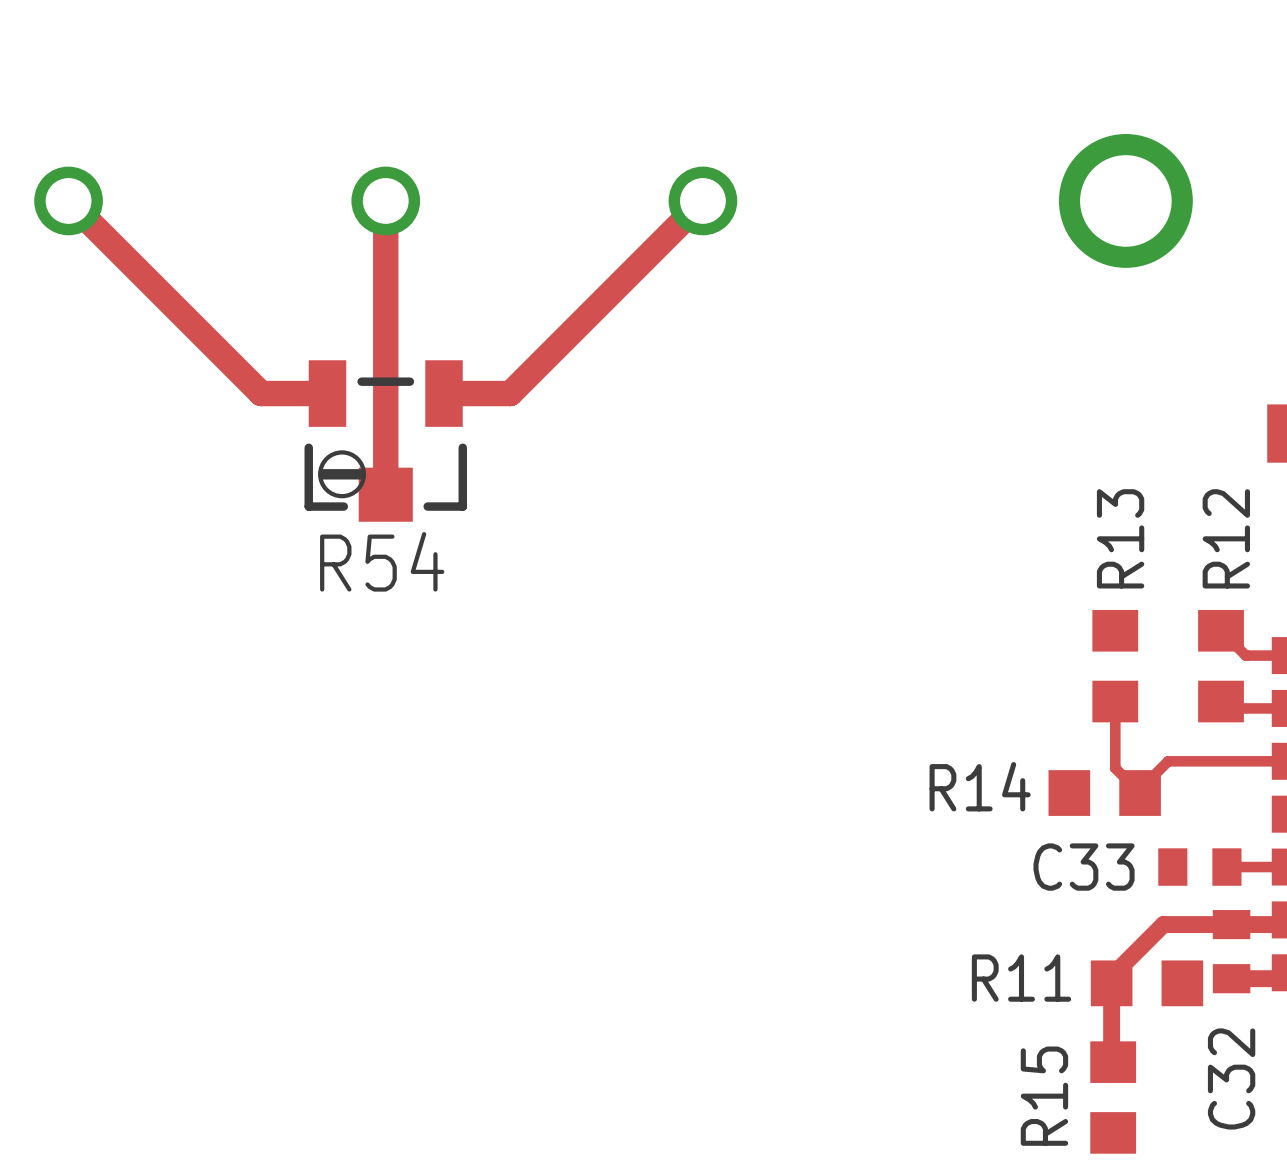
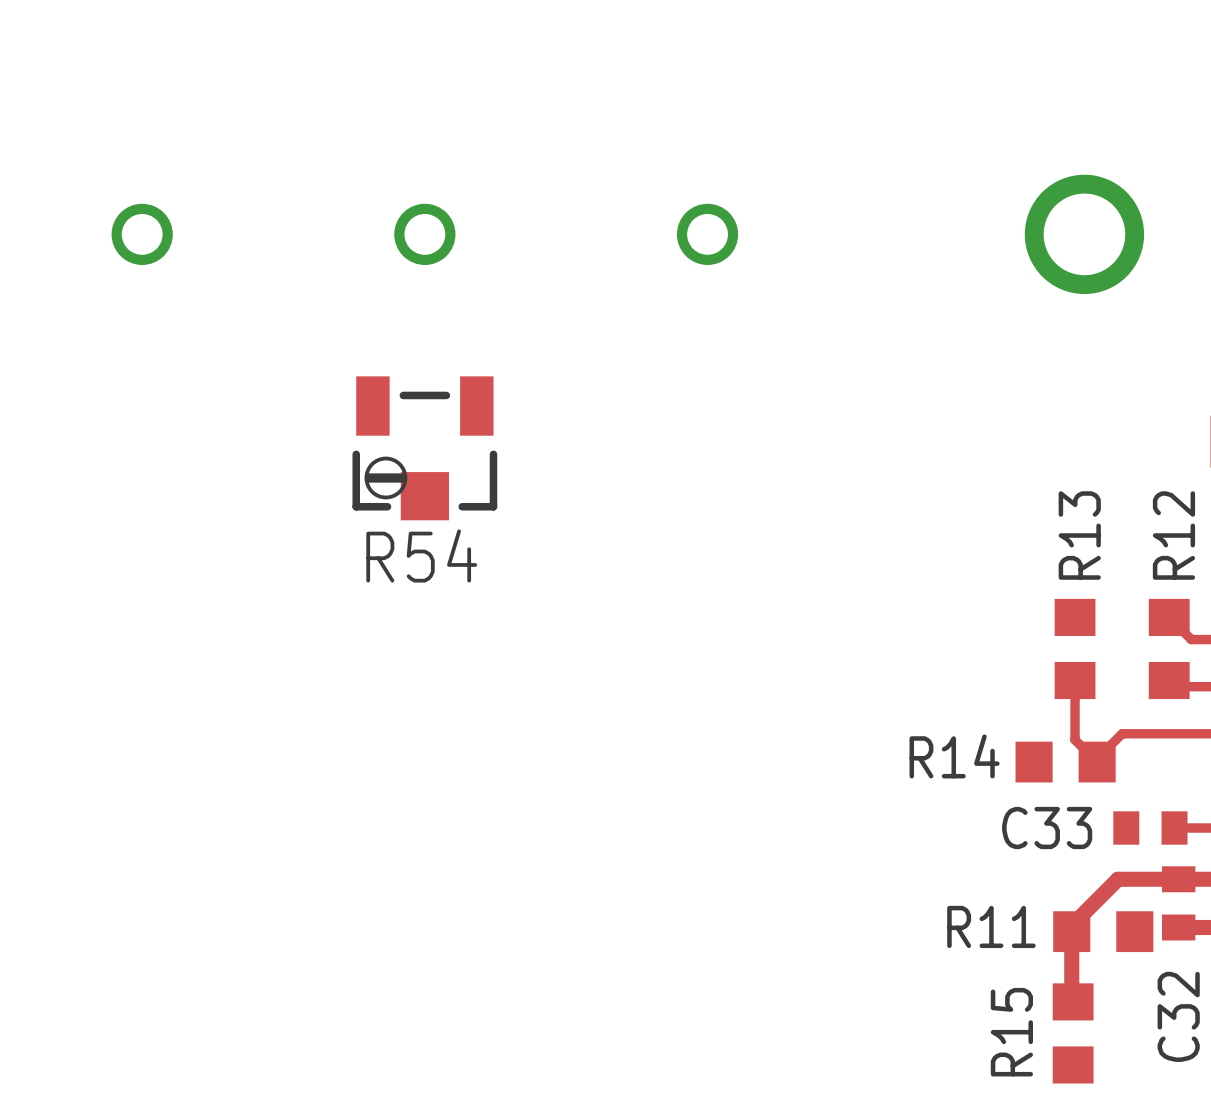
top track: (68, 200) (261, 393) (327, 393) -> none
top track: (385, 200) (385, 494) -> none
top track: (702, 200) (510, 393) (444, 393) -> none

